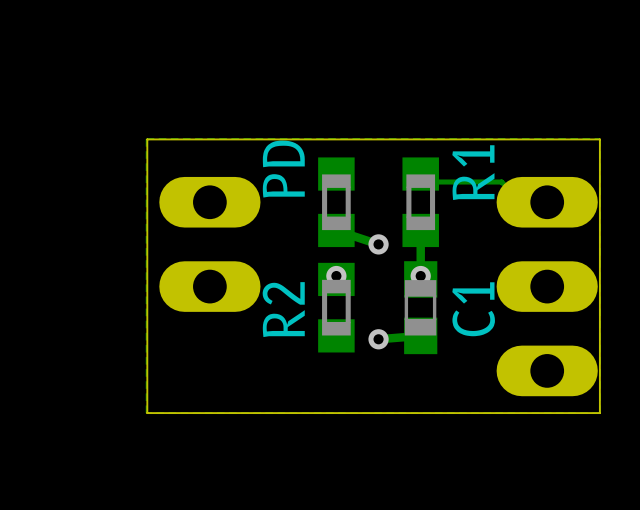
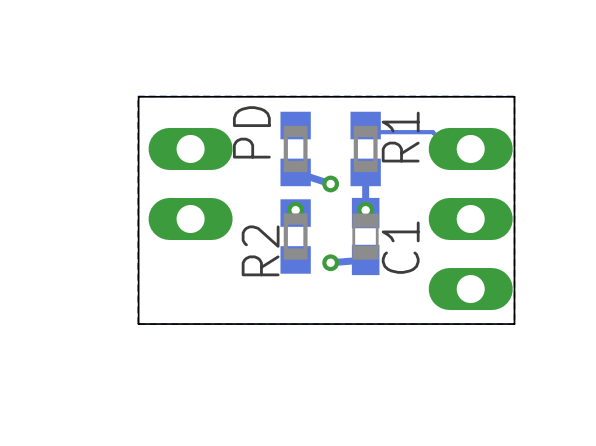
text: PD (283, 169) -> none
text: R1 (473, 172) -> none
R1 name: none -> R1 (400, 137)
PD name: none -> PD (251, 132)
text: R2 (283, 309) -> none
text: C1 (473, 309) -> none
R2 name: none -> R2 (260, 250)
C1 name: none -> C1 (400, 247)

